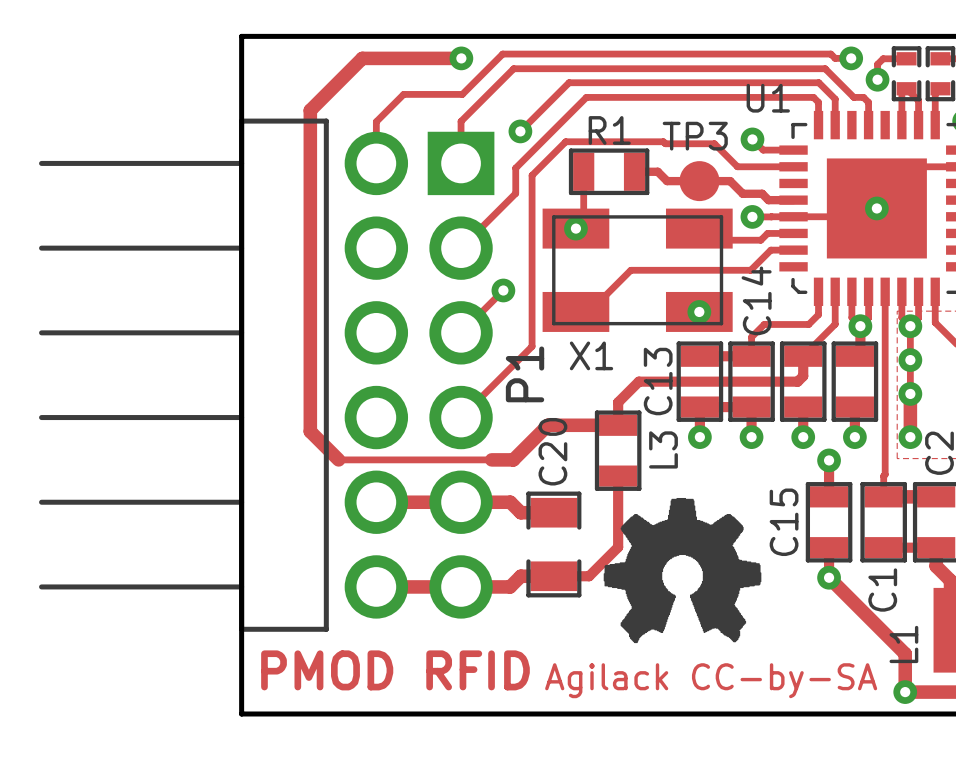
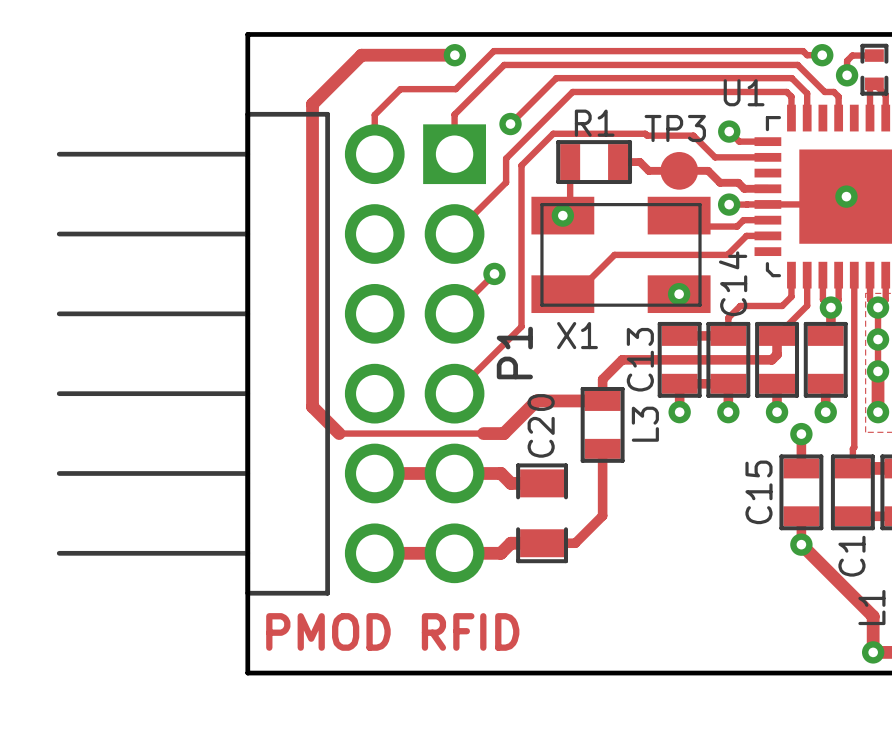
drawing: [603, 498, 762, 644] -> none
text: Agilack CC-by-SA (711, 680) -> none

